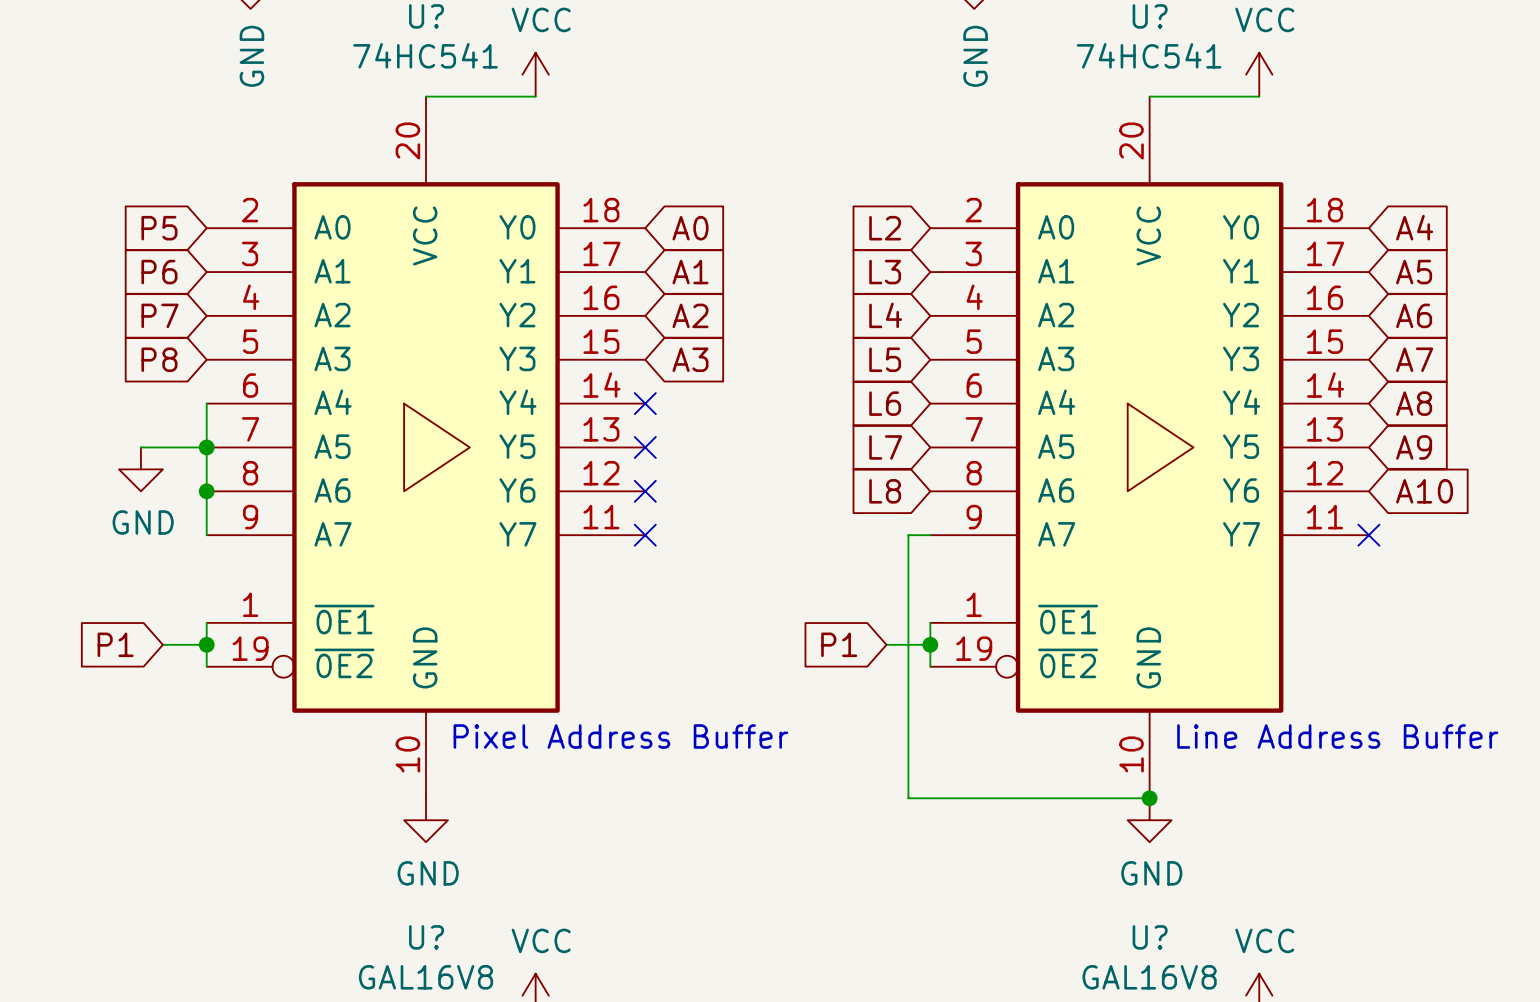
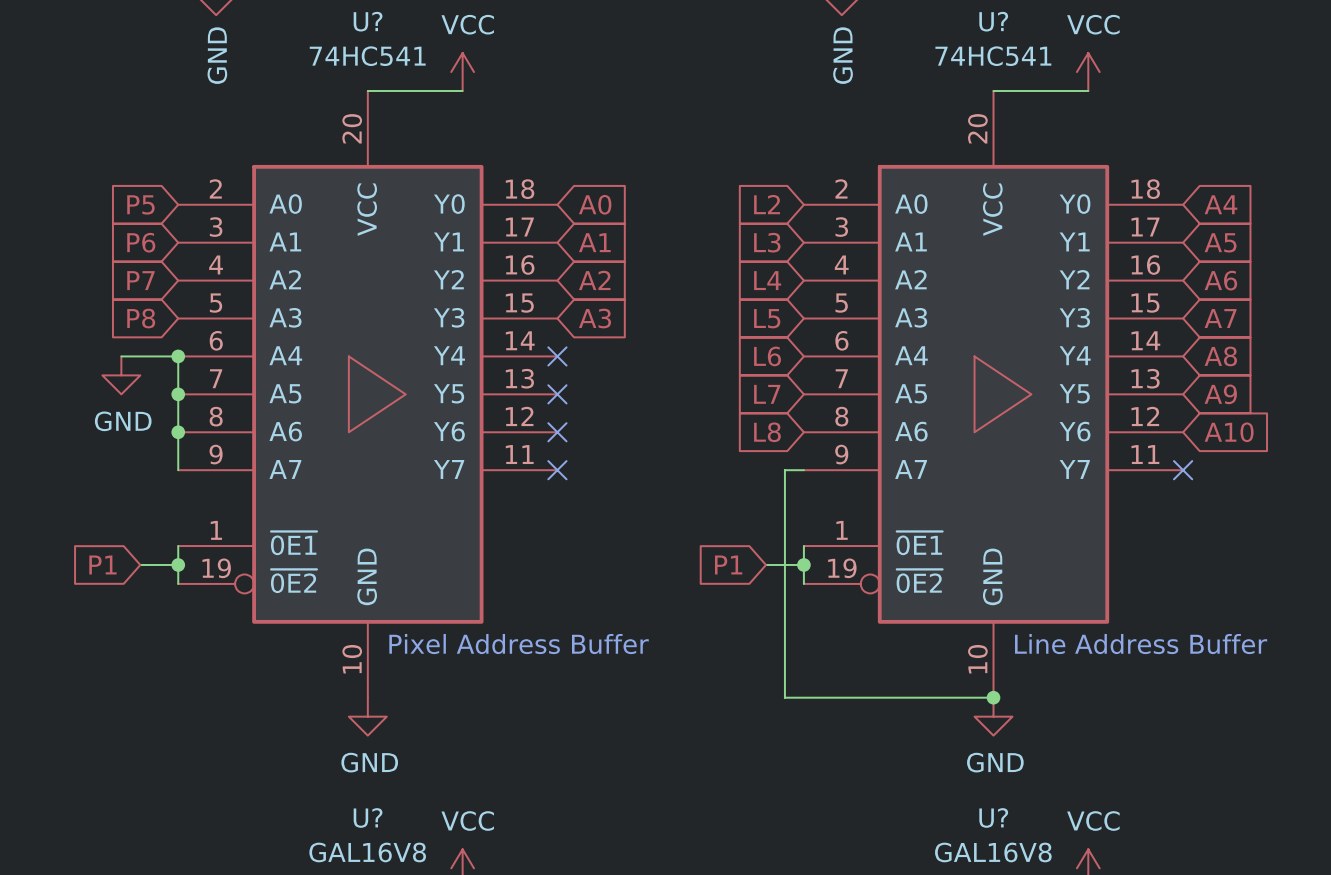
junction: none -> (178, 356)
wire: (140, 447) (206, 447) -> (121, 356) (178, 356)
power symbol position: GND (140, 469) -> GND (121, 375)

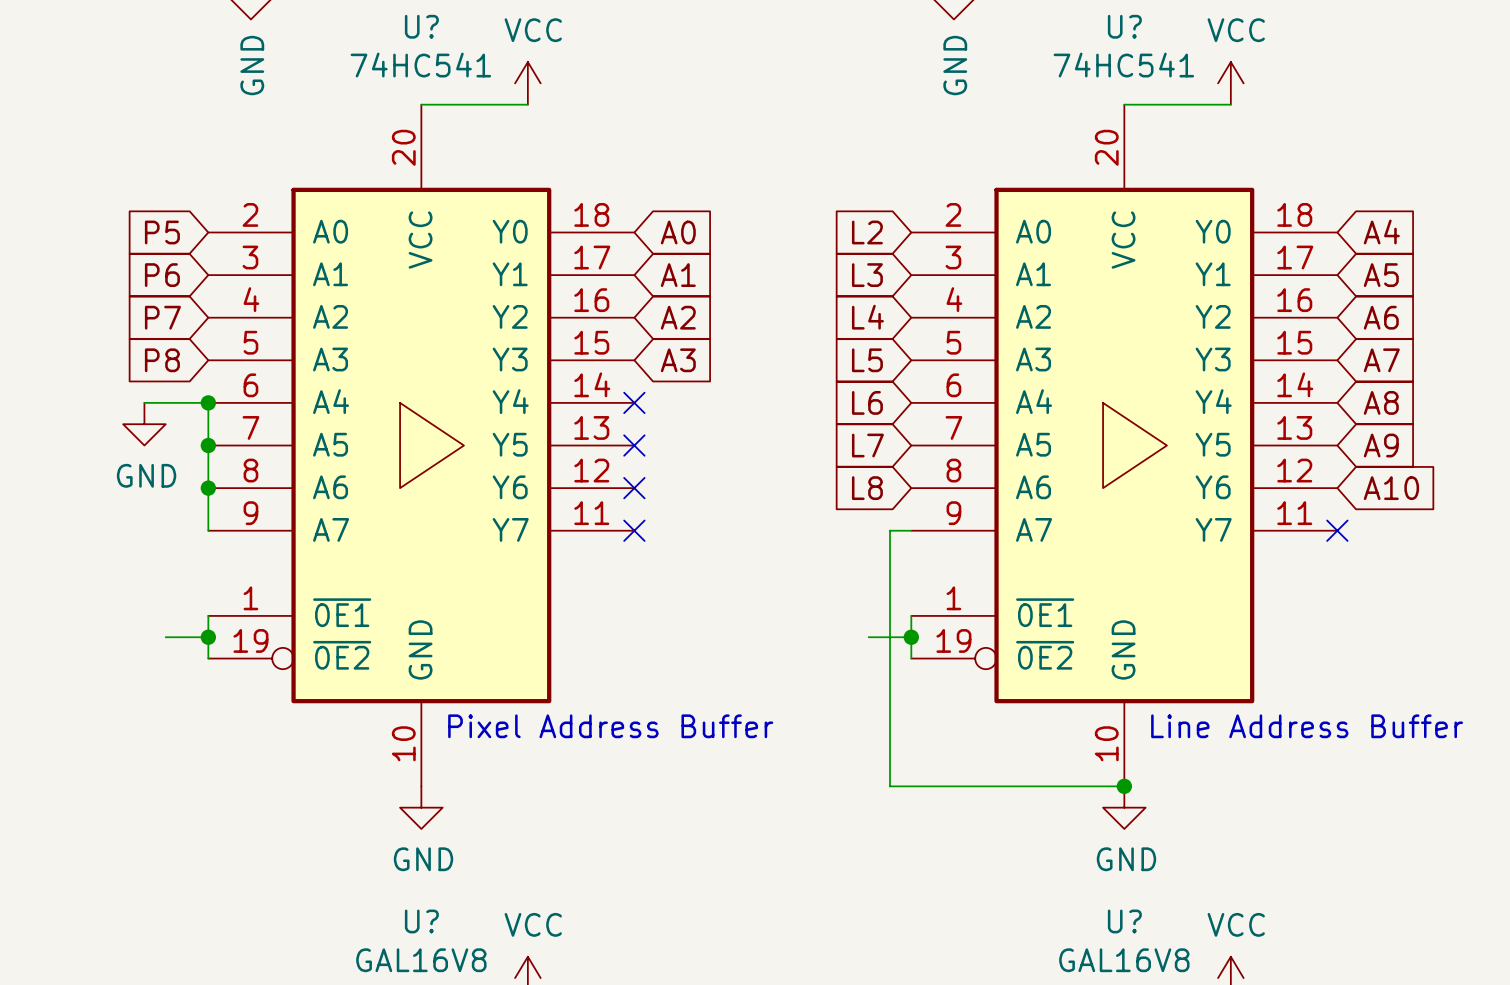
global label: P1 (102, 564) -> none
global label: P1 (728, 564) -> none

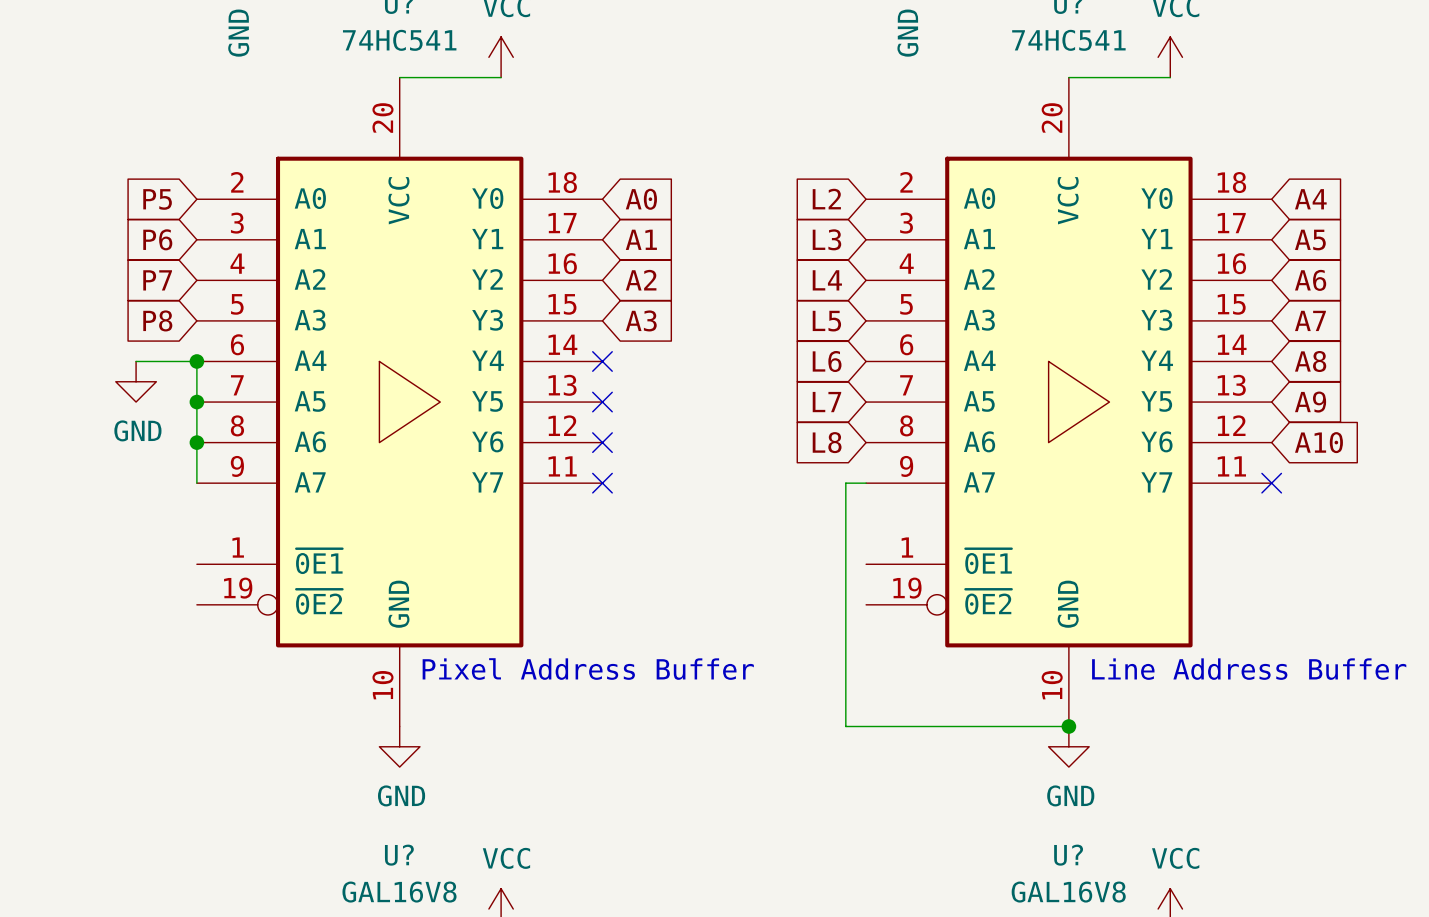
wire: (208, 615) (208, 658) -> none
wire: (911, 615) (911, 658) -> none
wire: (165, 637) (208, 637) -> none
junction: (208, 637) -> none
wire: (868, 637) (911, 637) -> none
junction: (911, 637) -> none

